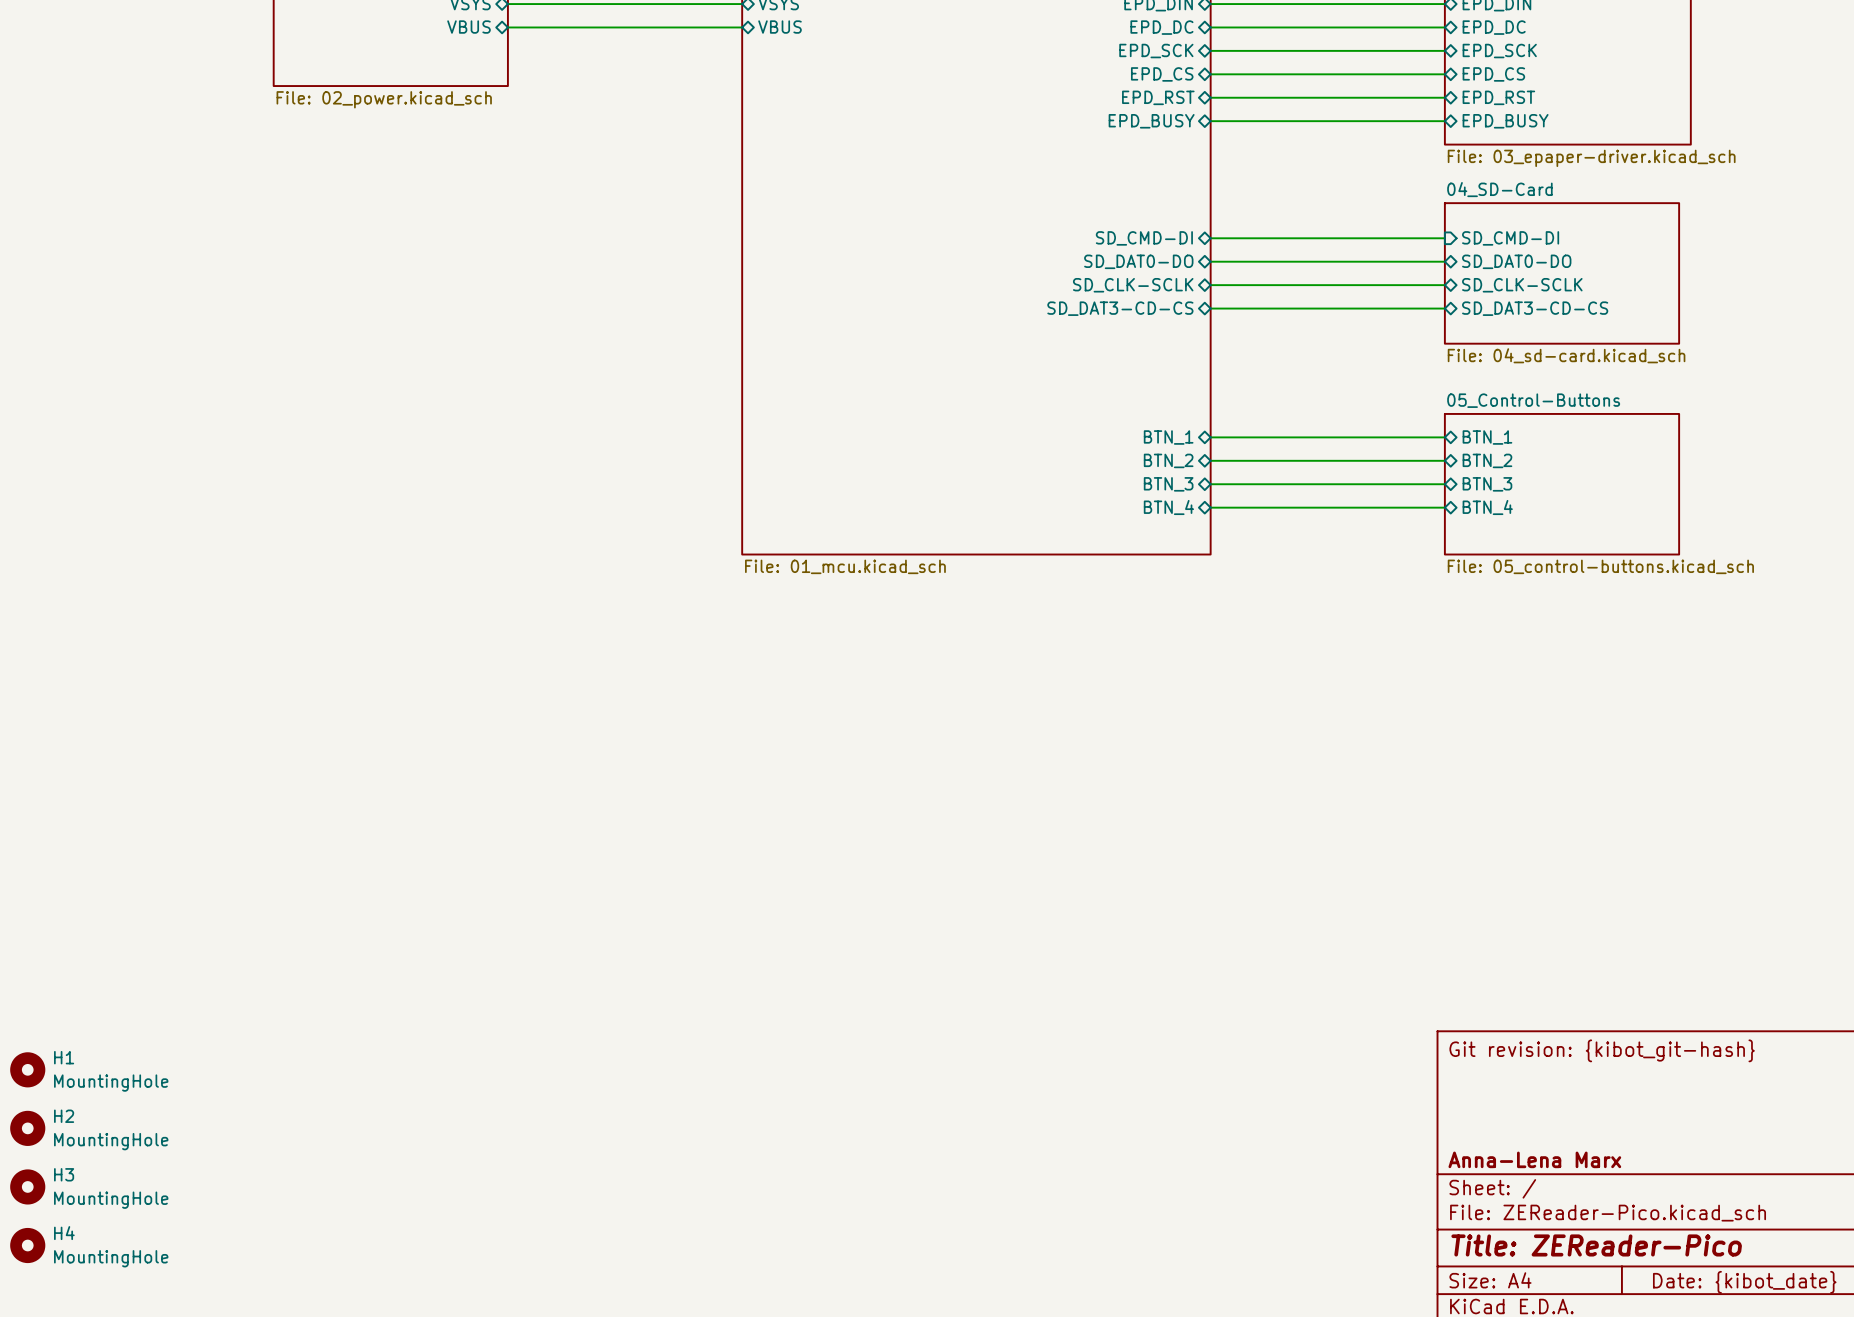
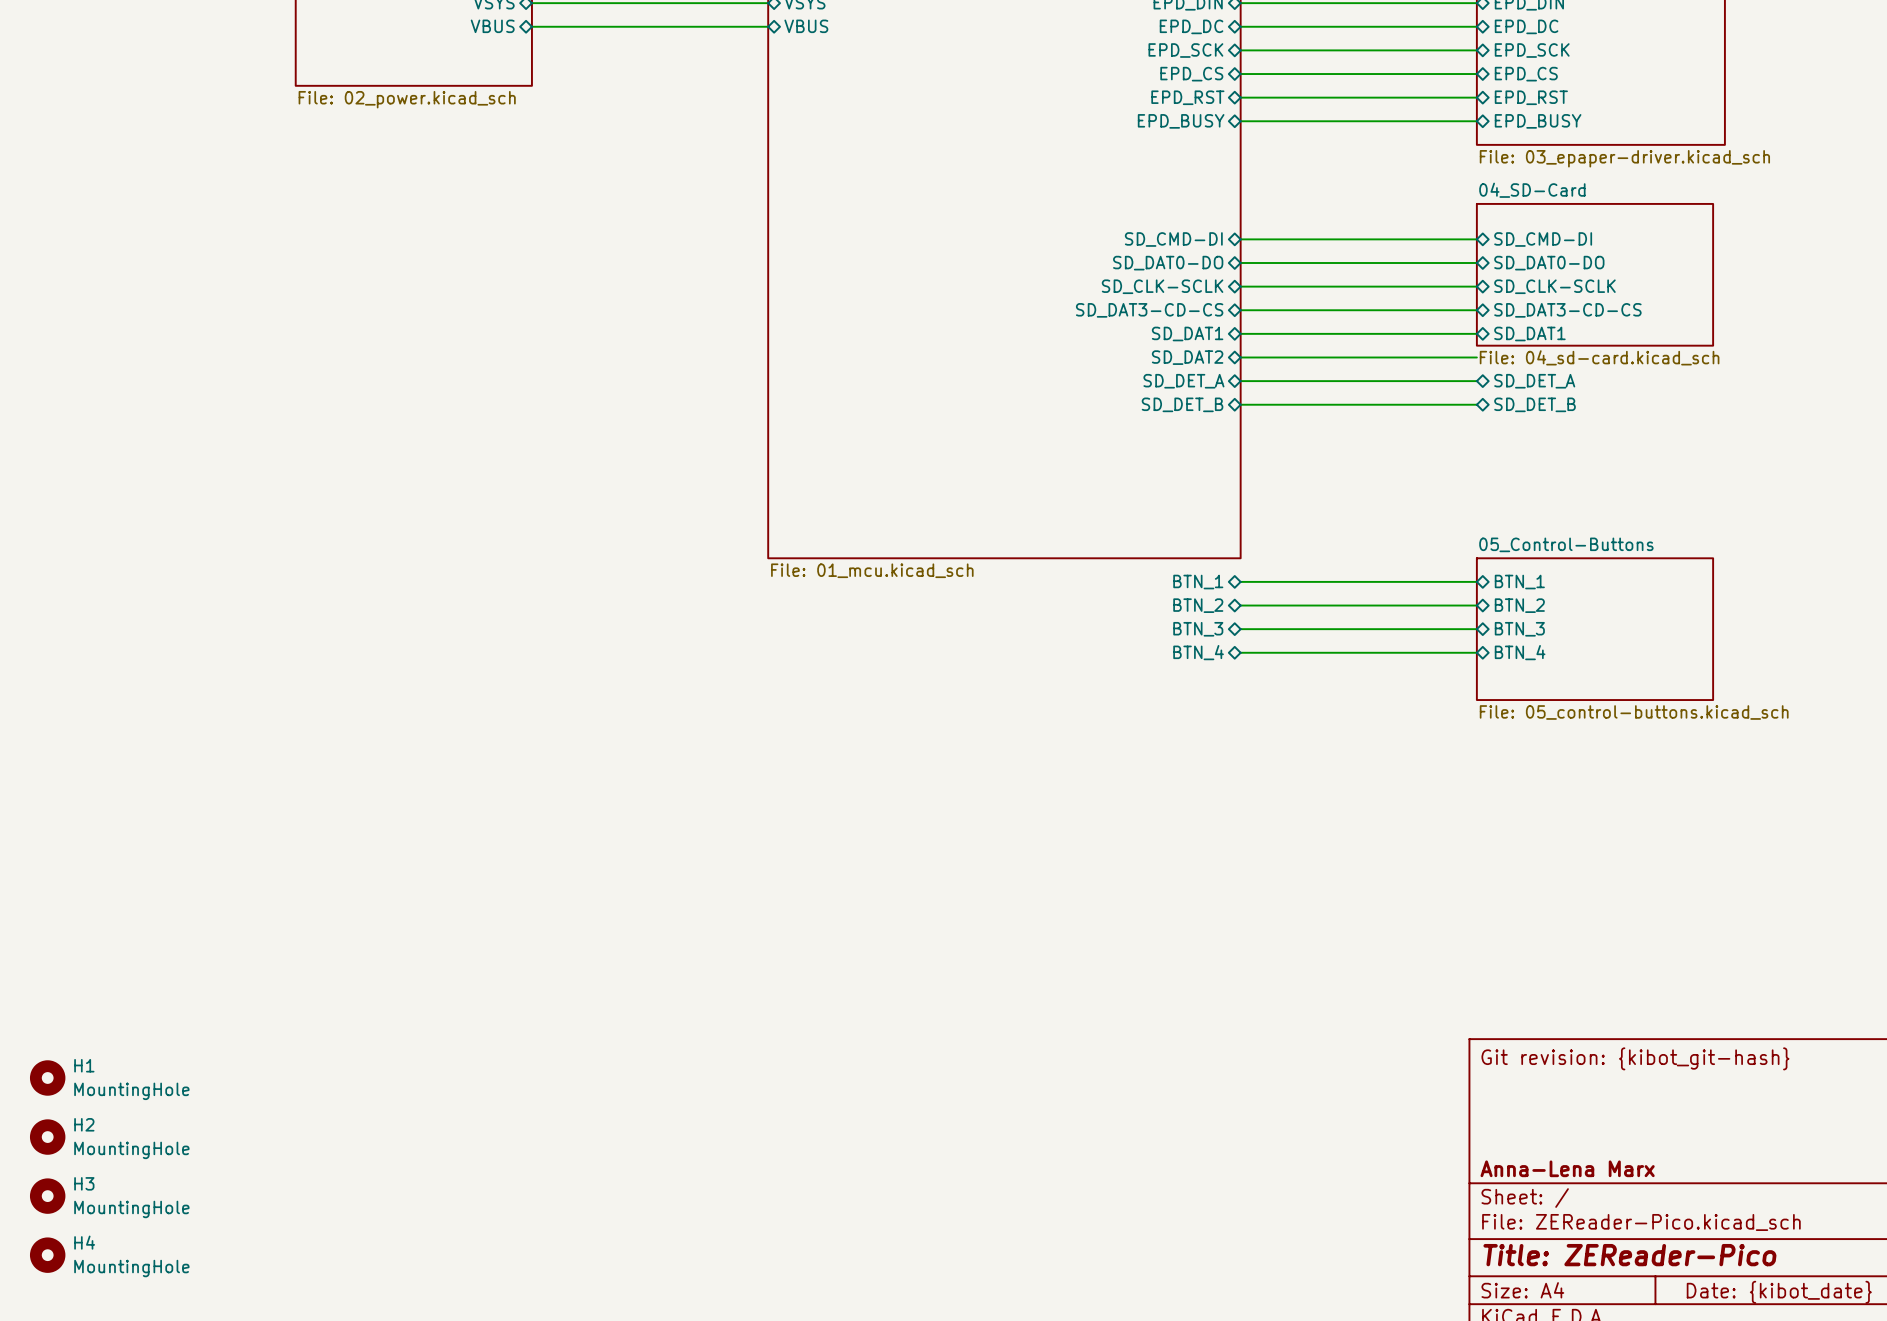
sheet pin shape: input (1510, 238) -> bidirectional (1543, 239)
sheet pin: none -> SD_DAT1 (1187, 333)
sheet pin: none -> SD_DAT1 (1529, 333)
sheet pin: none -> SD_DAT2 (1187, 357)
sheet pin: none -> SD_DET_A (1183, 381)
sheet pin: none -> SD_DET_A (1534, 381)
sheet pin: none -> SD_DET_B (1182, 404)
sheet pin: none -> SD_DET_B (1535, 404)
sheet pin position: BTN_1 (1168, 437) -> BTN_1 (1198, 582)
wire: (1210, 437) (1444, 437) -> (1240, 333) (1476, 333)
sheet pin position: BTN_1 (1487, 437) -> BTN_1 (1519, 582)
sheet pin position: BTN_2 (1168, 460) -> BTN_2 (1198, 605)
wire: (1210, 460) (1444, 460) -> (1240, 357) (1476, 357)
sheet pin position: BTN_2 (1487, 460) -> BTN_2 (1519, 605)
sheet pin position: BTN_3 (1168, 484) -> BTN_3 (1198, 629)
wire: (1210, 484) (1444, 484) -> (1240, 381) (1476, 381)
sheet pin position: BTN_3 (1487, 484) -> BTN_3 (1519, 629)
sheet 05_Control-Buttons position: (1562, 484) -> (1595, 629)
sheet pin position: BTN_4 (1168, 507) -> BTN_4 (1198, 652)
wire: (1210, 507) (1444, 507) -> (1240, 404) (1476, 404)
sheet pin position: BTN_4 (1487, 507) -> BTN_4 (1520, 652)
wire: none -> (1240, 581) (1476, 581)
wire: none -> (1240, 605) (1476, 605)
wire: none -> (1240, 629) (1476, 629)
wire: none -> (1240, 652) (1476, 652)

